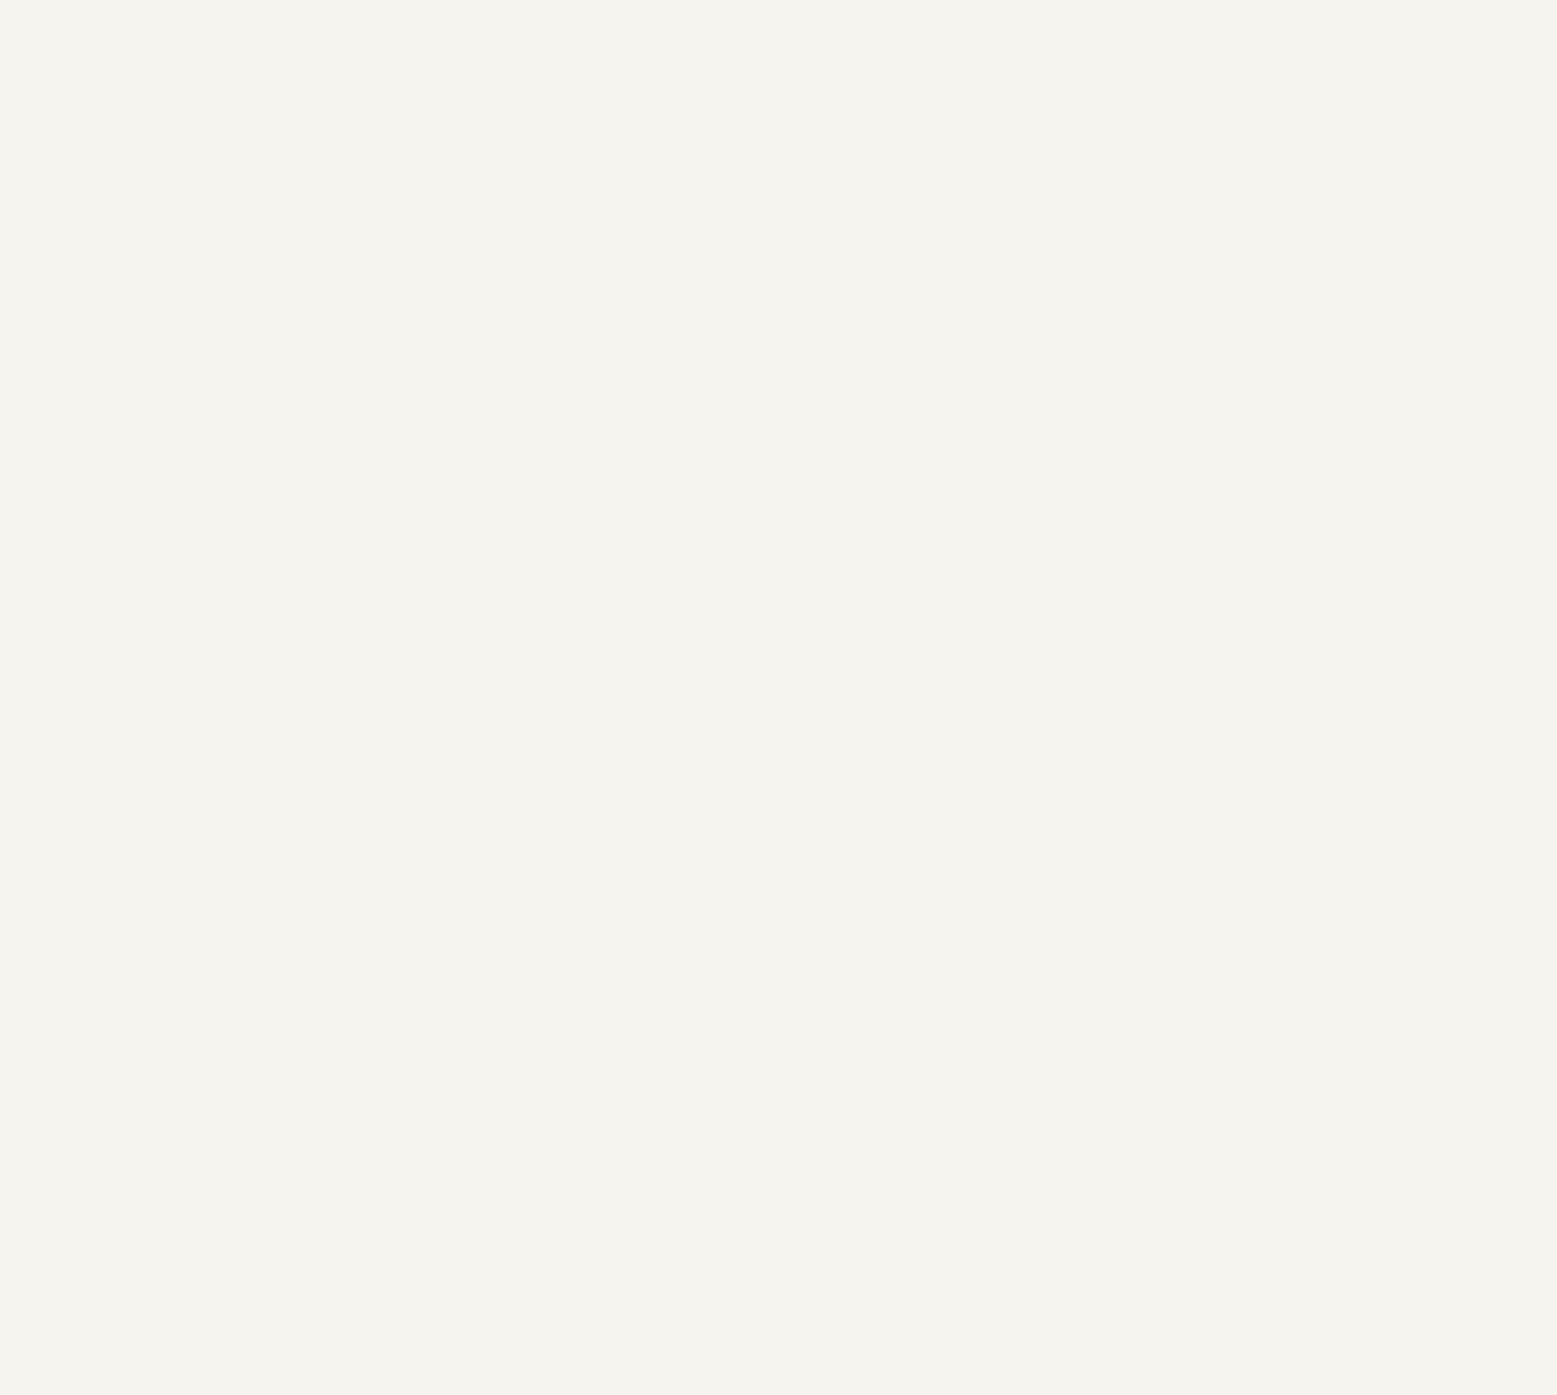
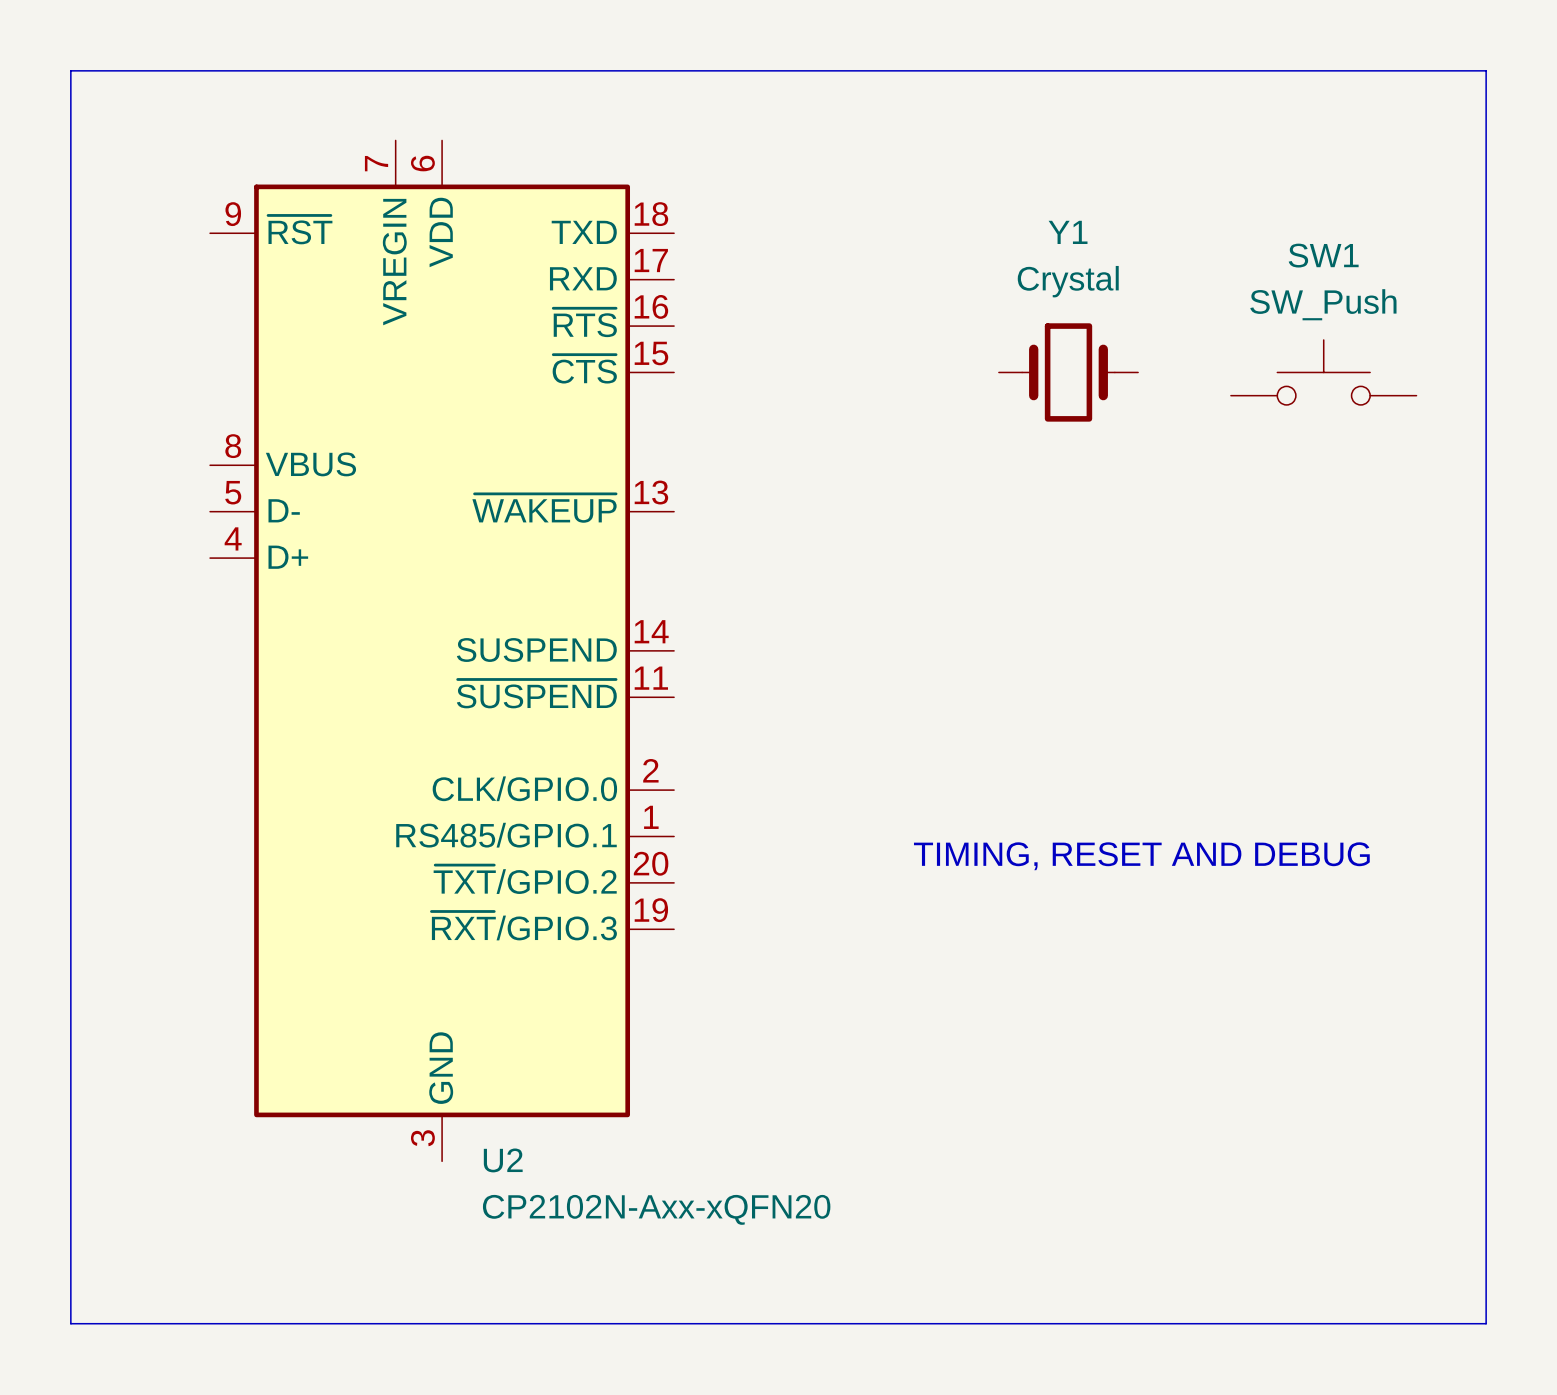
line: none -> (70, 70) (1486, 70) (1486, 1323) (70, 1323) (70, 70)
Y1: none -> Crystal (1068, 372)
SW1: none -> SW_Push (1323, 372)
U2: none -> CP2102N-Axx-xQFN20 (442, 650)
text: none -> TIMING, RESET AND DEBUG (1141, 856)

